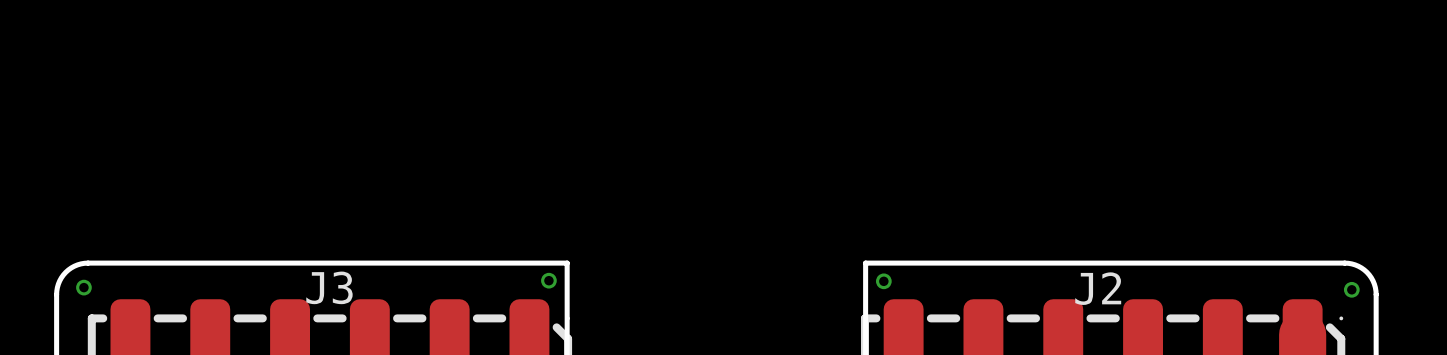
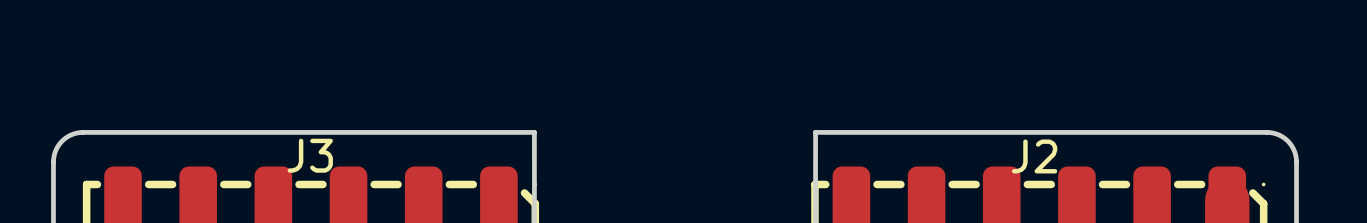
via: (548, 280) -> none
via: (883, 281) -> none
via: (83, 287) -> none
via: (1351, 289) -> none

